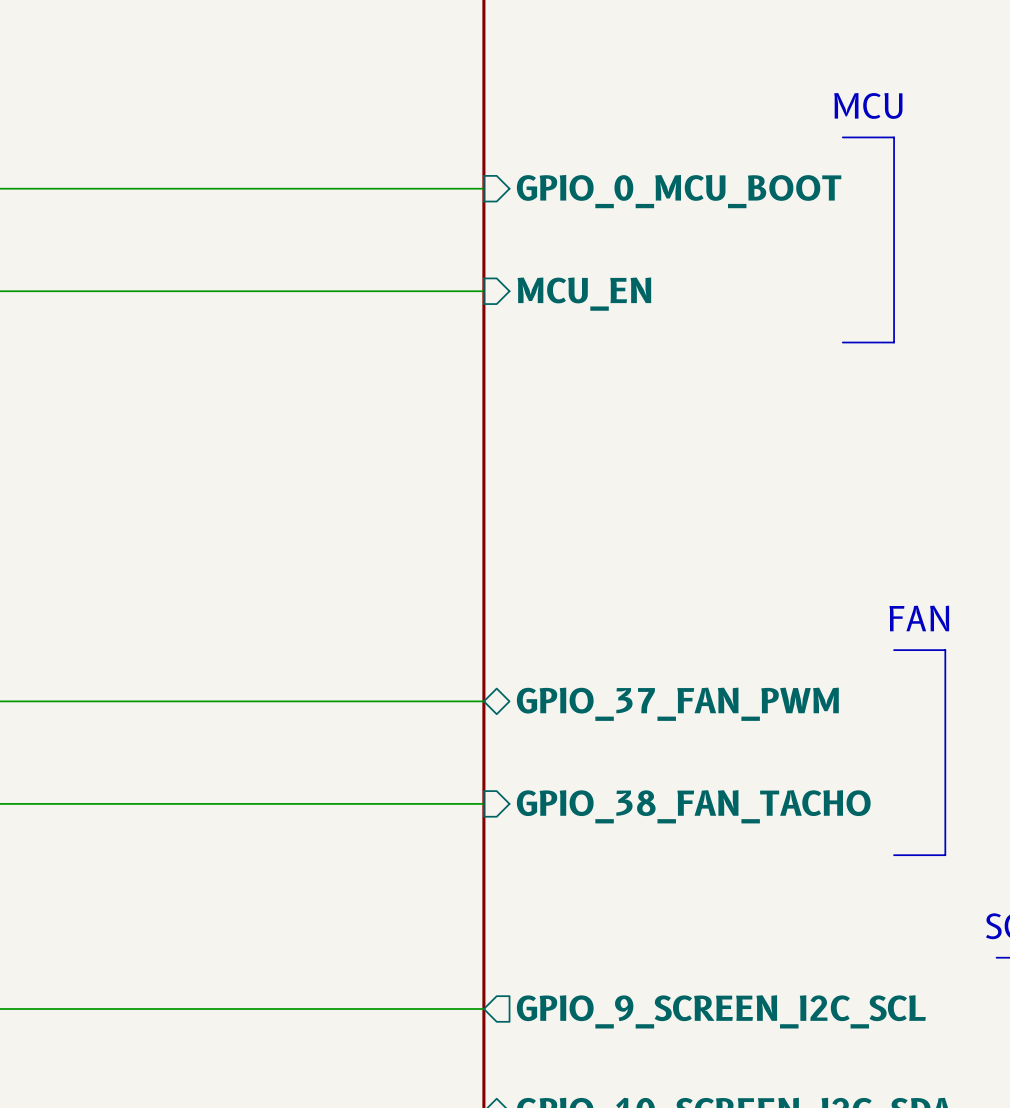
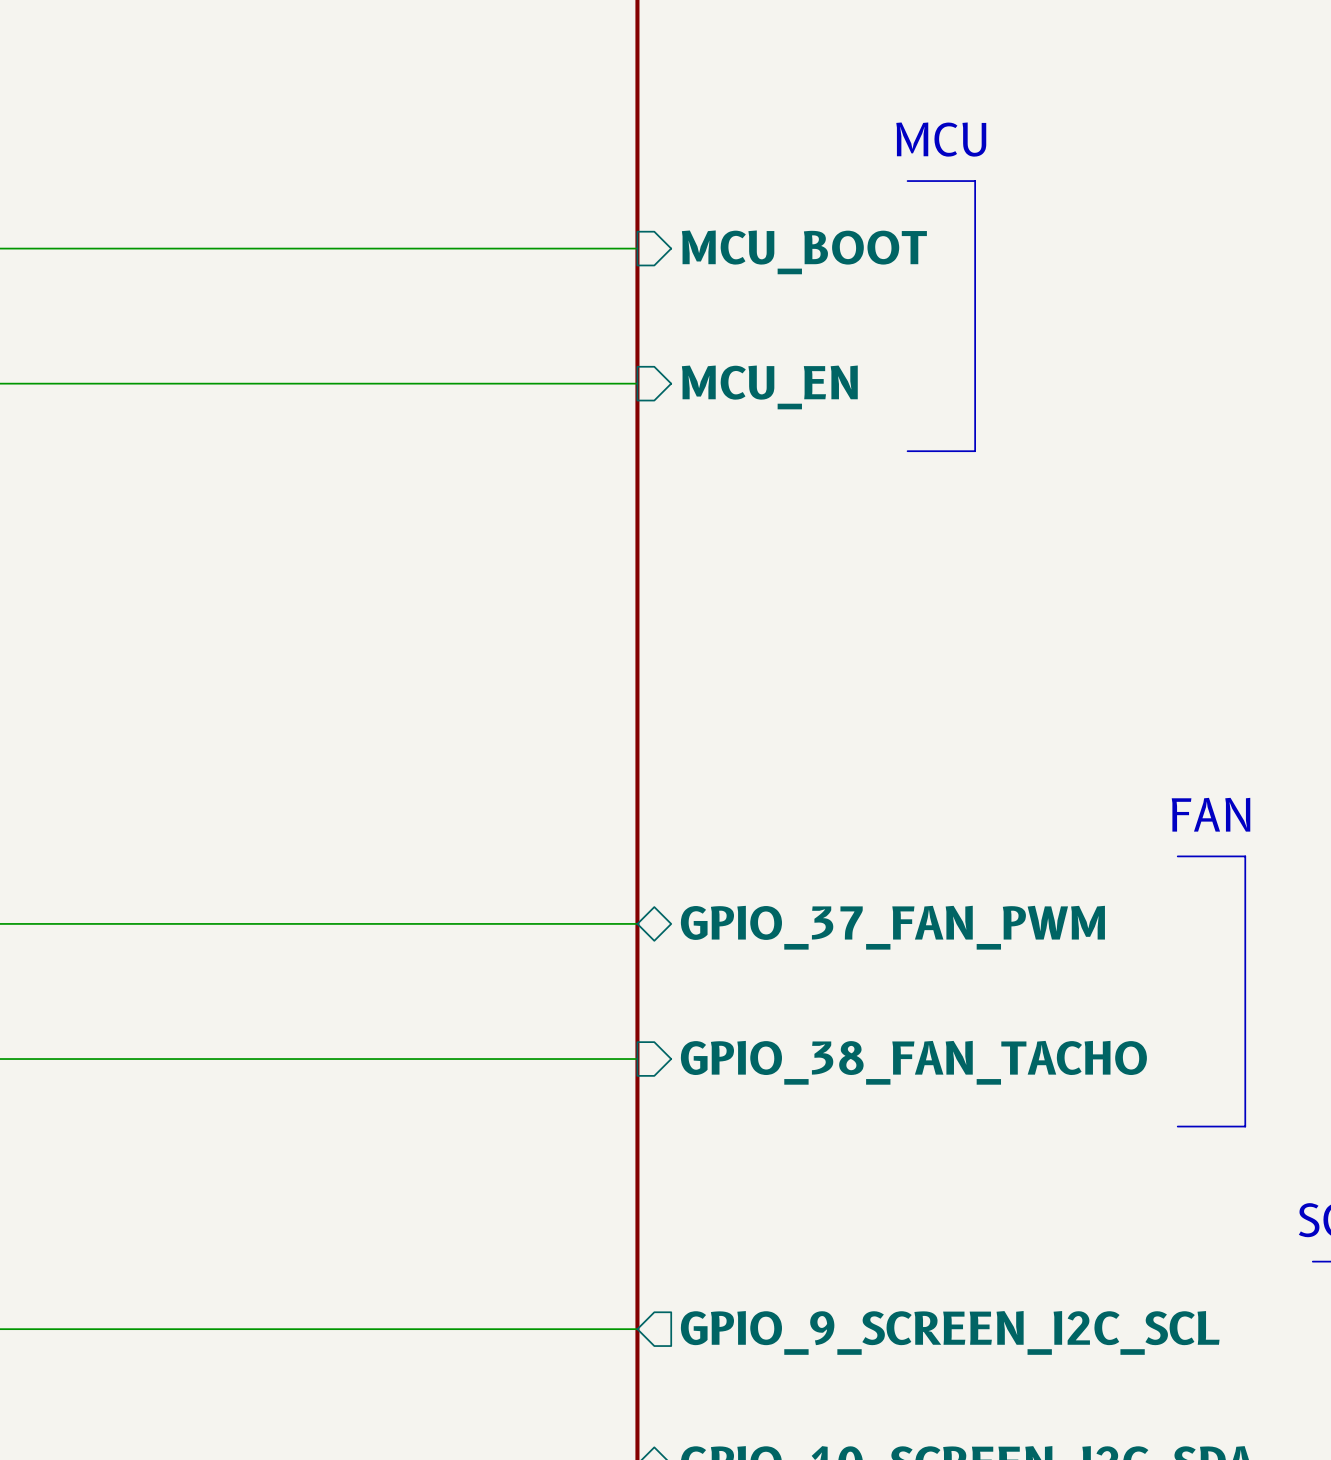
text position: MCU (868, 105) -> MCU (941, 139)
line: (842, 137) (894, 137) (894, 342) (842, 342) -> (907, 181) (975, 181) (975, 451) (907, 451)
sheet pin: GPIO_0_MCU_BOOT (679, 191) -> MCU_BOOT (804, 252)

